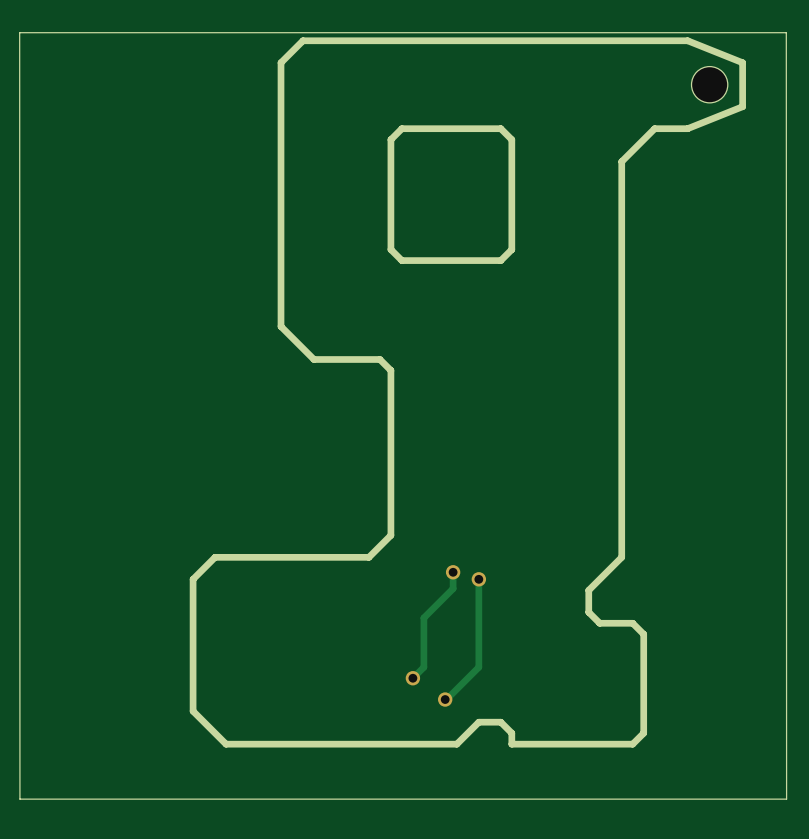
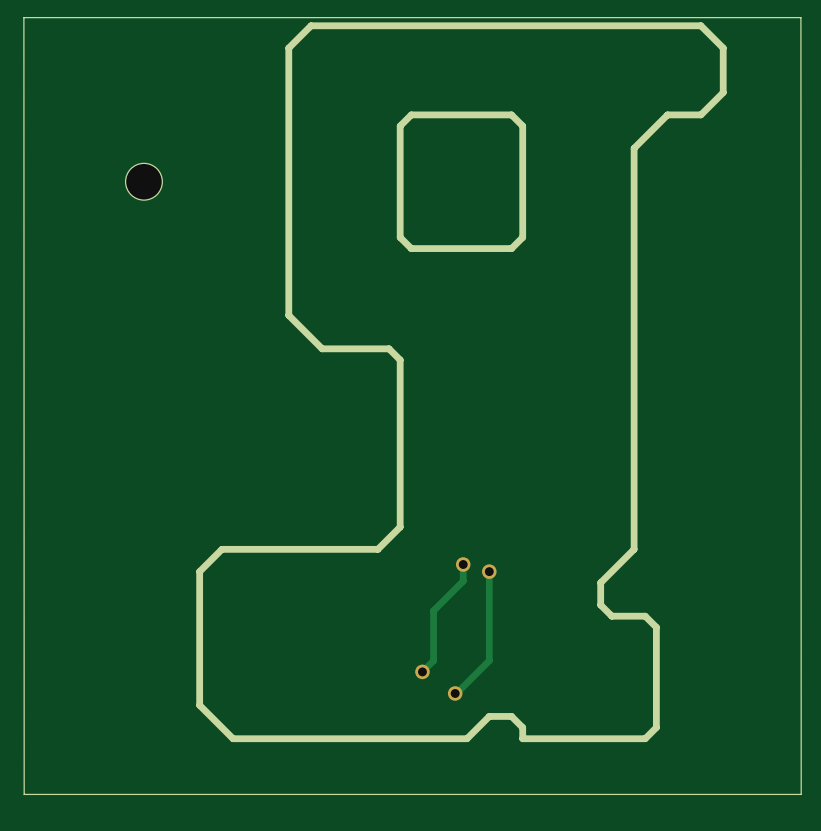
board edge: (687, 40) (742, 62) (742, 106) (687, 128) -> (700, 25) (723, 48) (723, 92) (700, 114)
hole: (709, 84) -> none
hole: none -> (143, 181)

